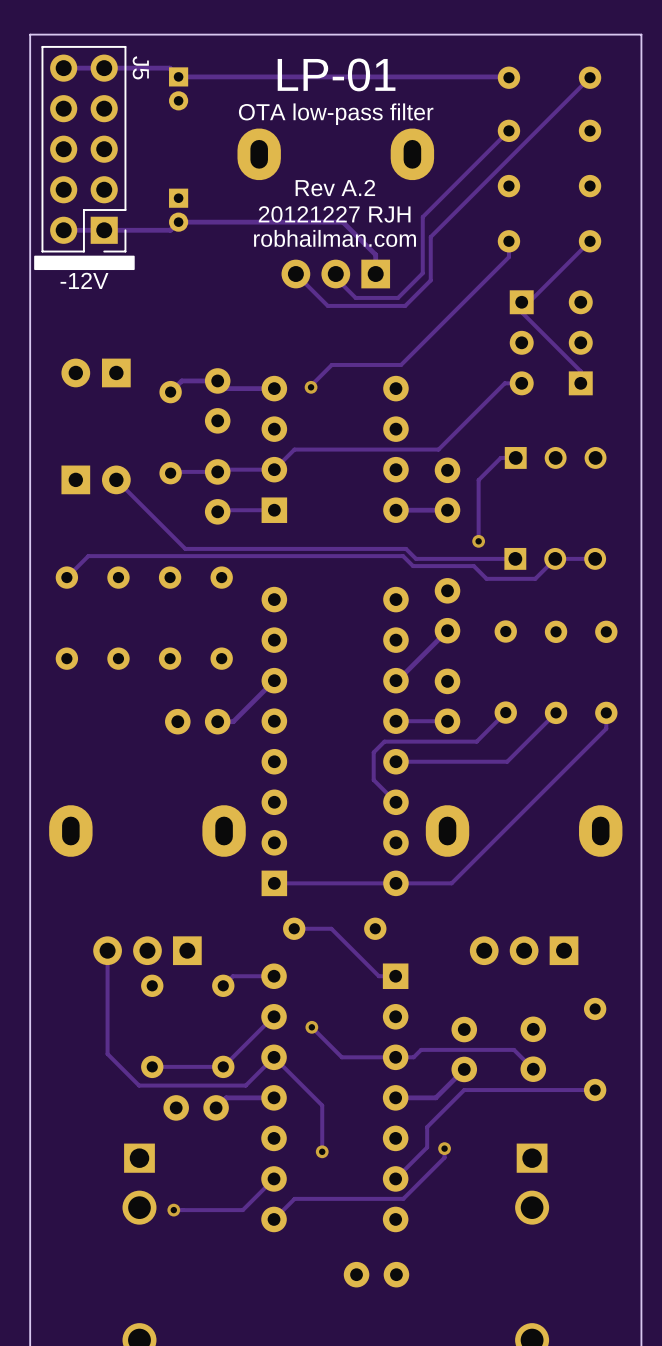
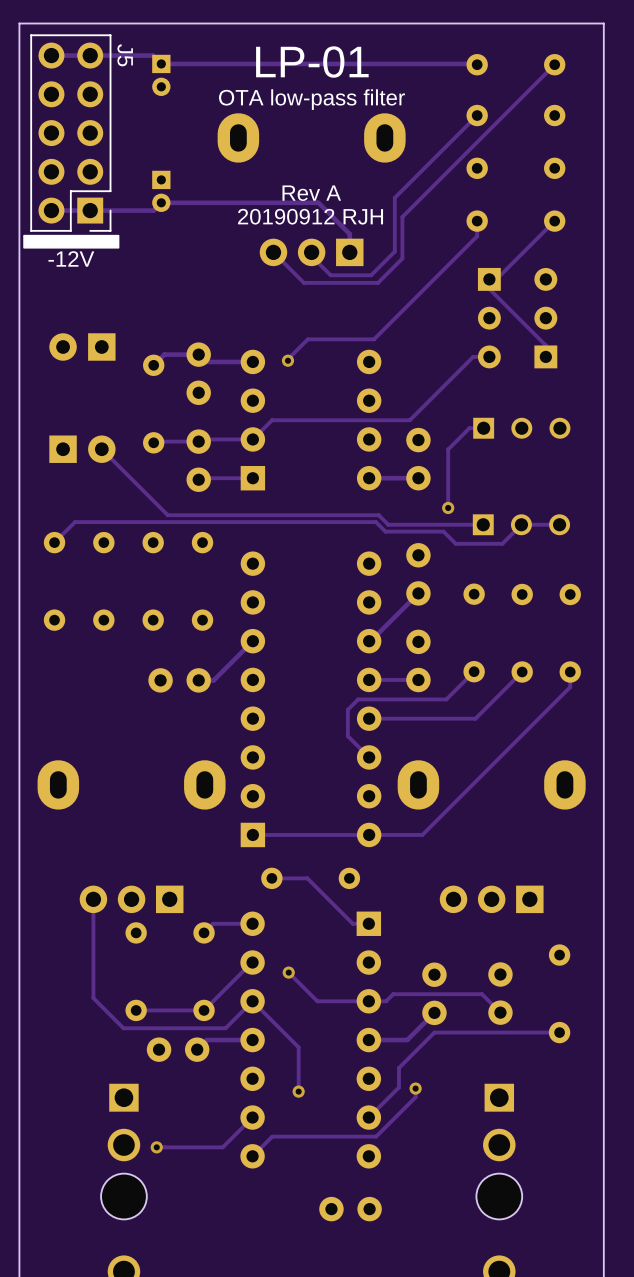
text: Rev A.2 (335, 188) -> none
text: 20121227 RJH (334, 214) -> Rev A (311, 193)
text: robhailman.com (335, 238) -> 20190912 RJH (310, 216)
part: none -> (123, 1196)
part: none -> (499, 1196)

